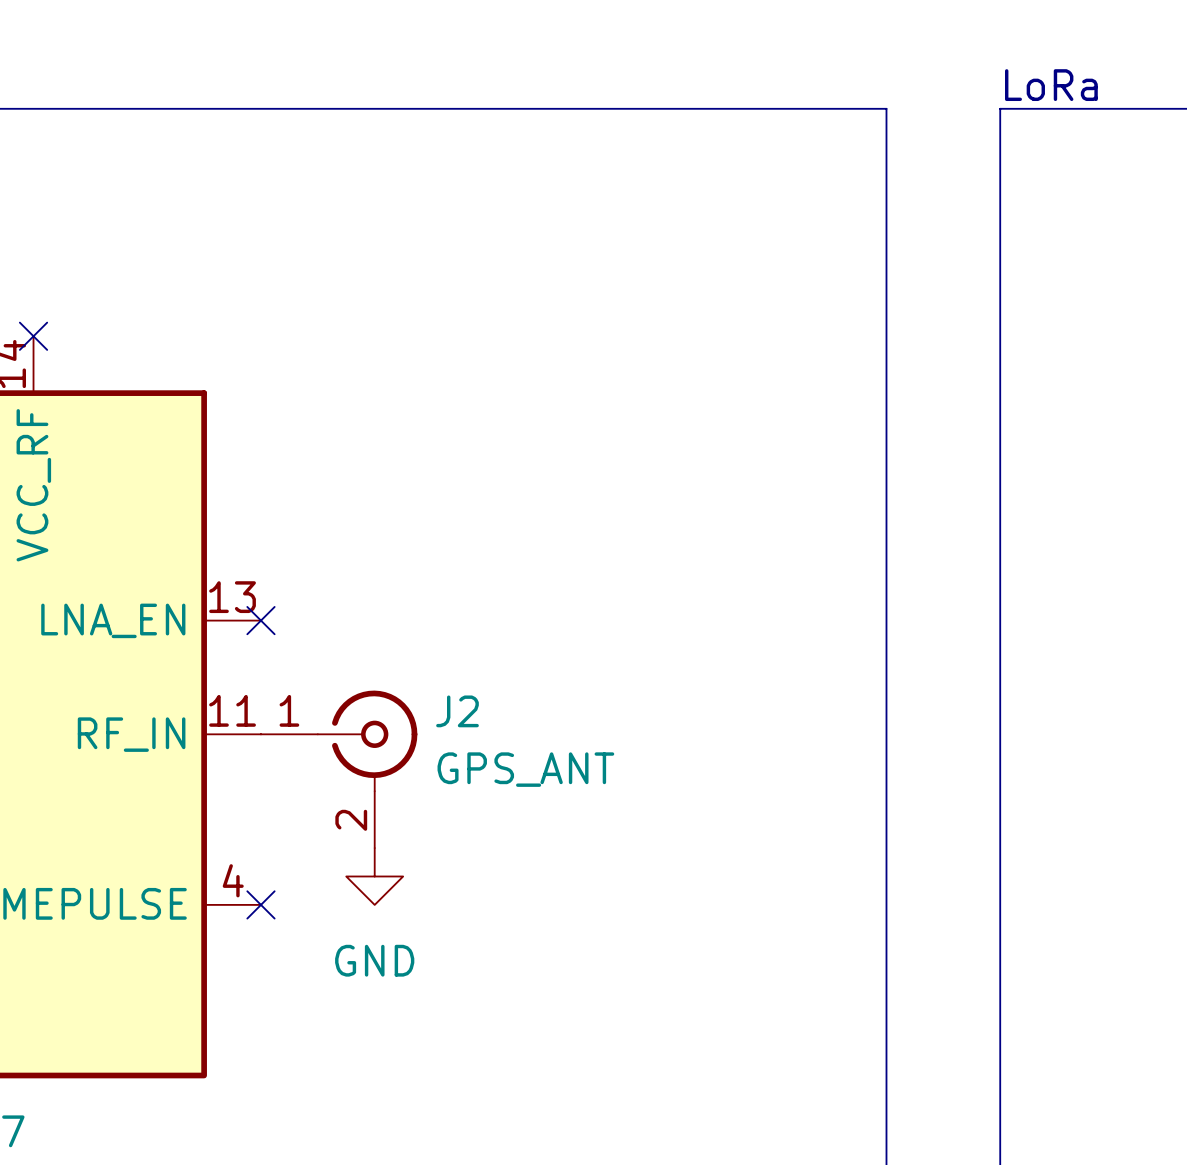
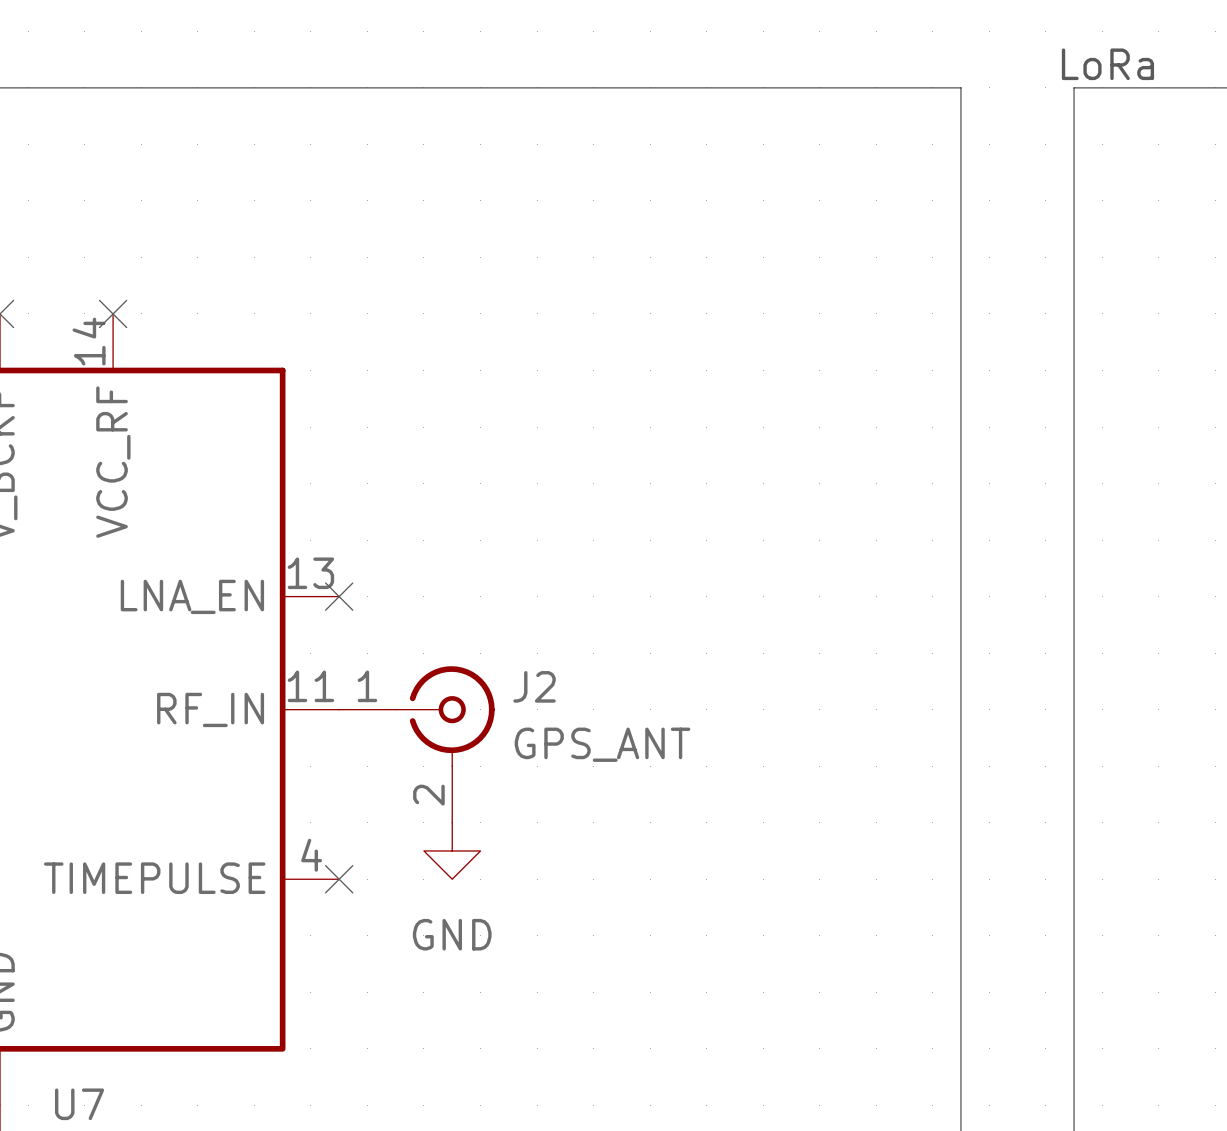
text position: LoRa (1051, 85) -> LoRa (1107, 64)

